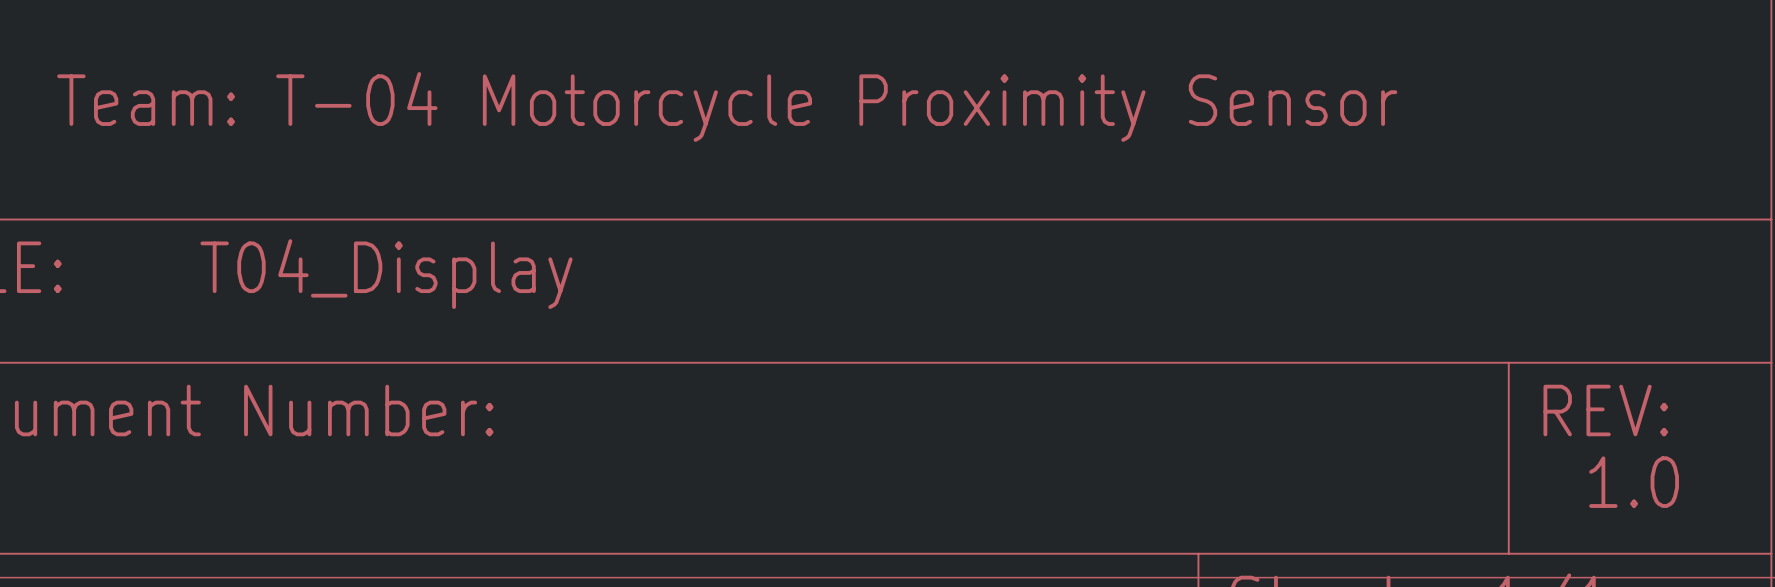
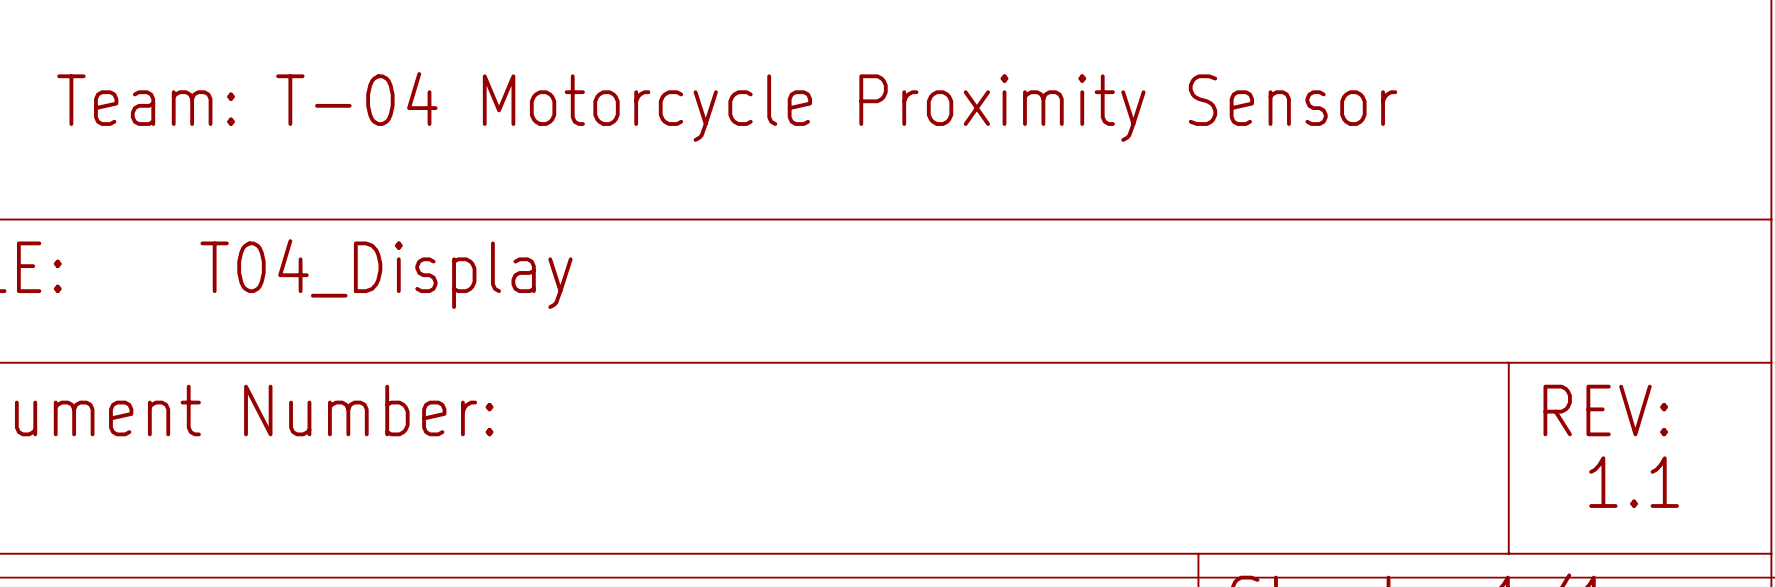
text: 1.0 (1634, 482) -> 1.1 (1634, 482)

